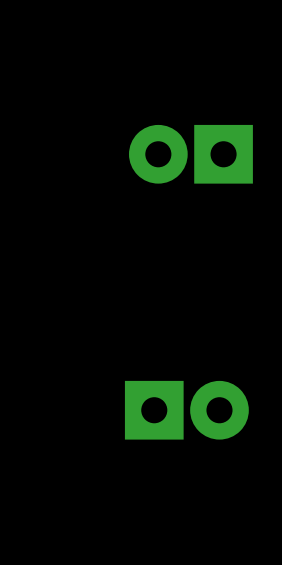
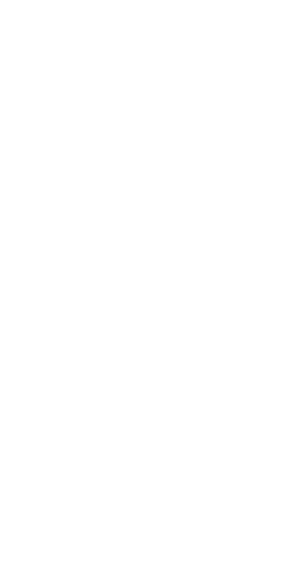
part: (190, 154) -> none
part: (186, 410) -> none

